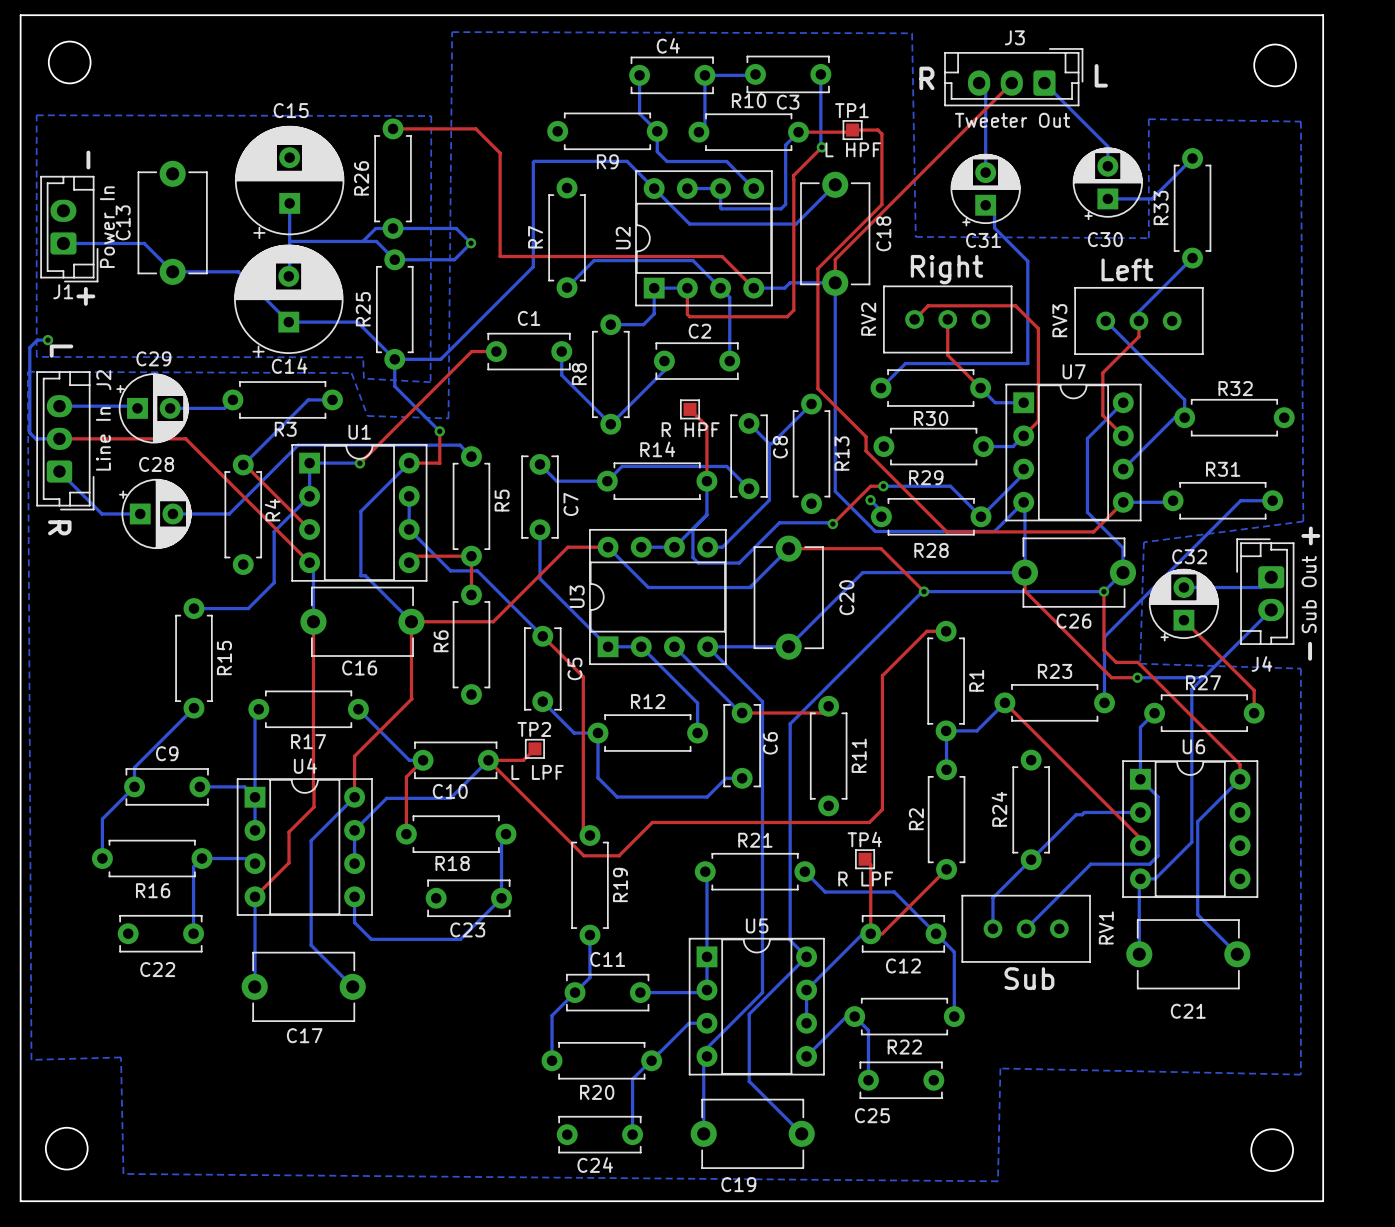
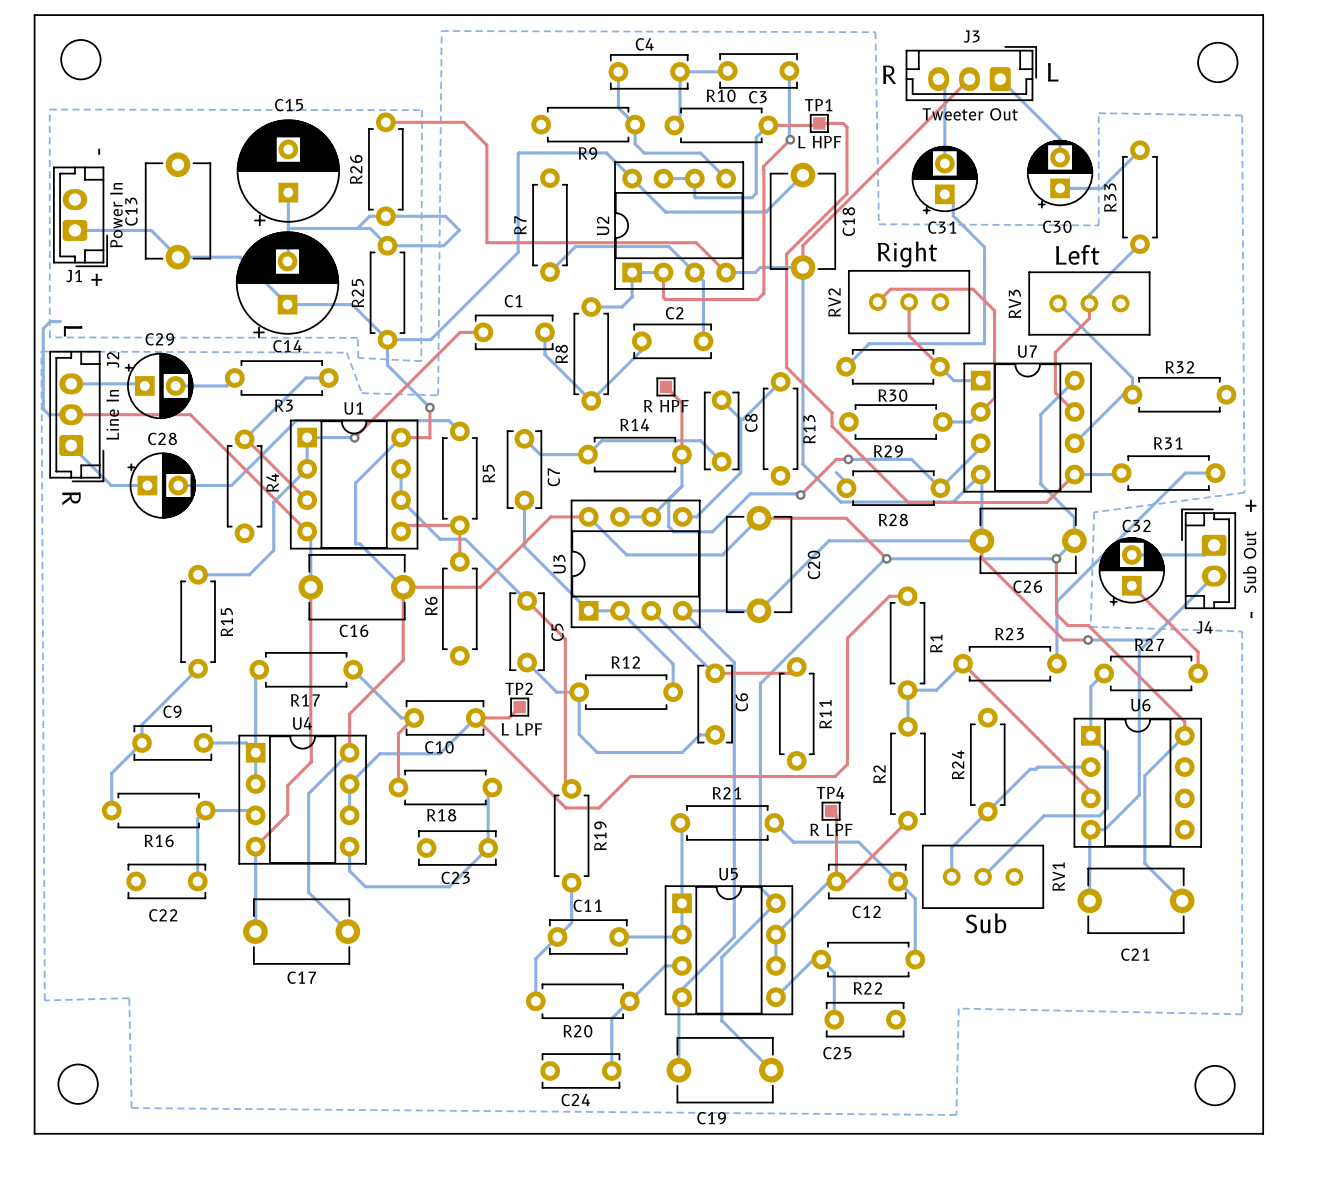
via: (471, 243) -> none
via: (47, 340) -> none
via: (870, 500) -> none

